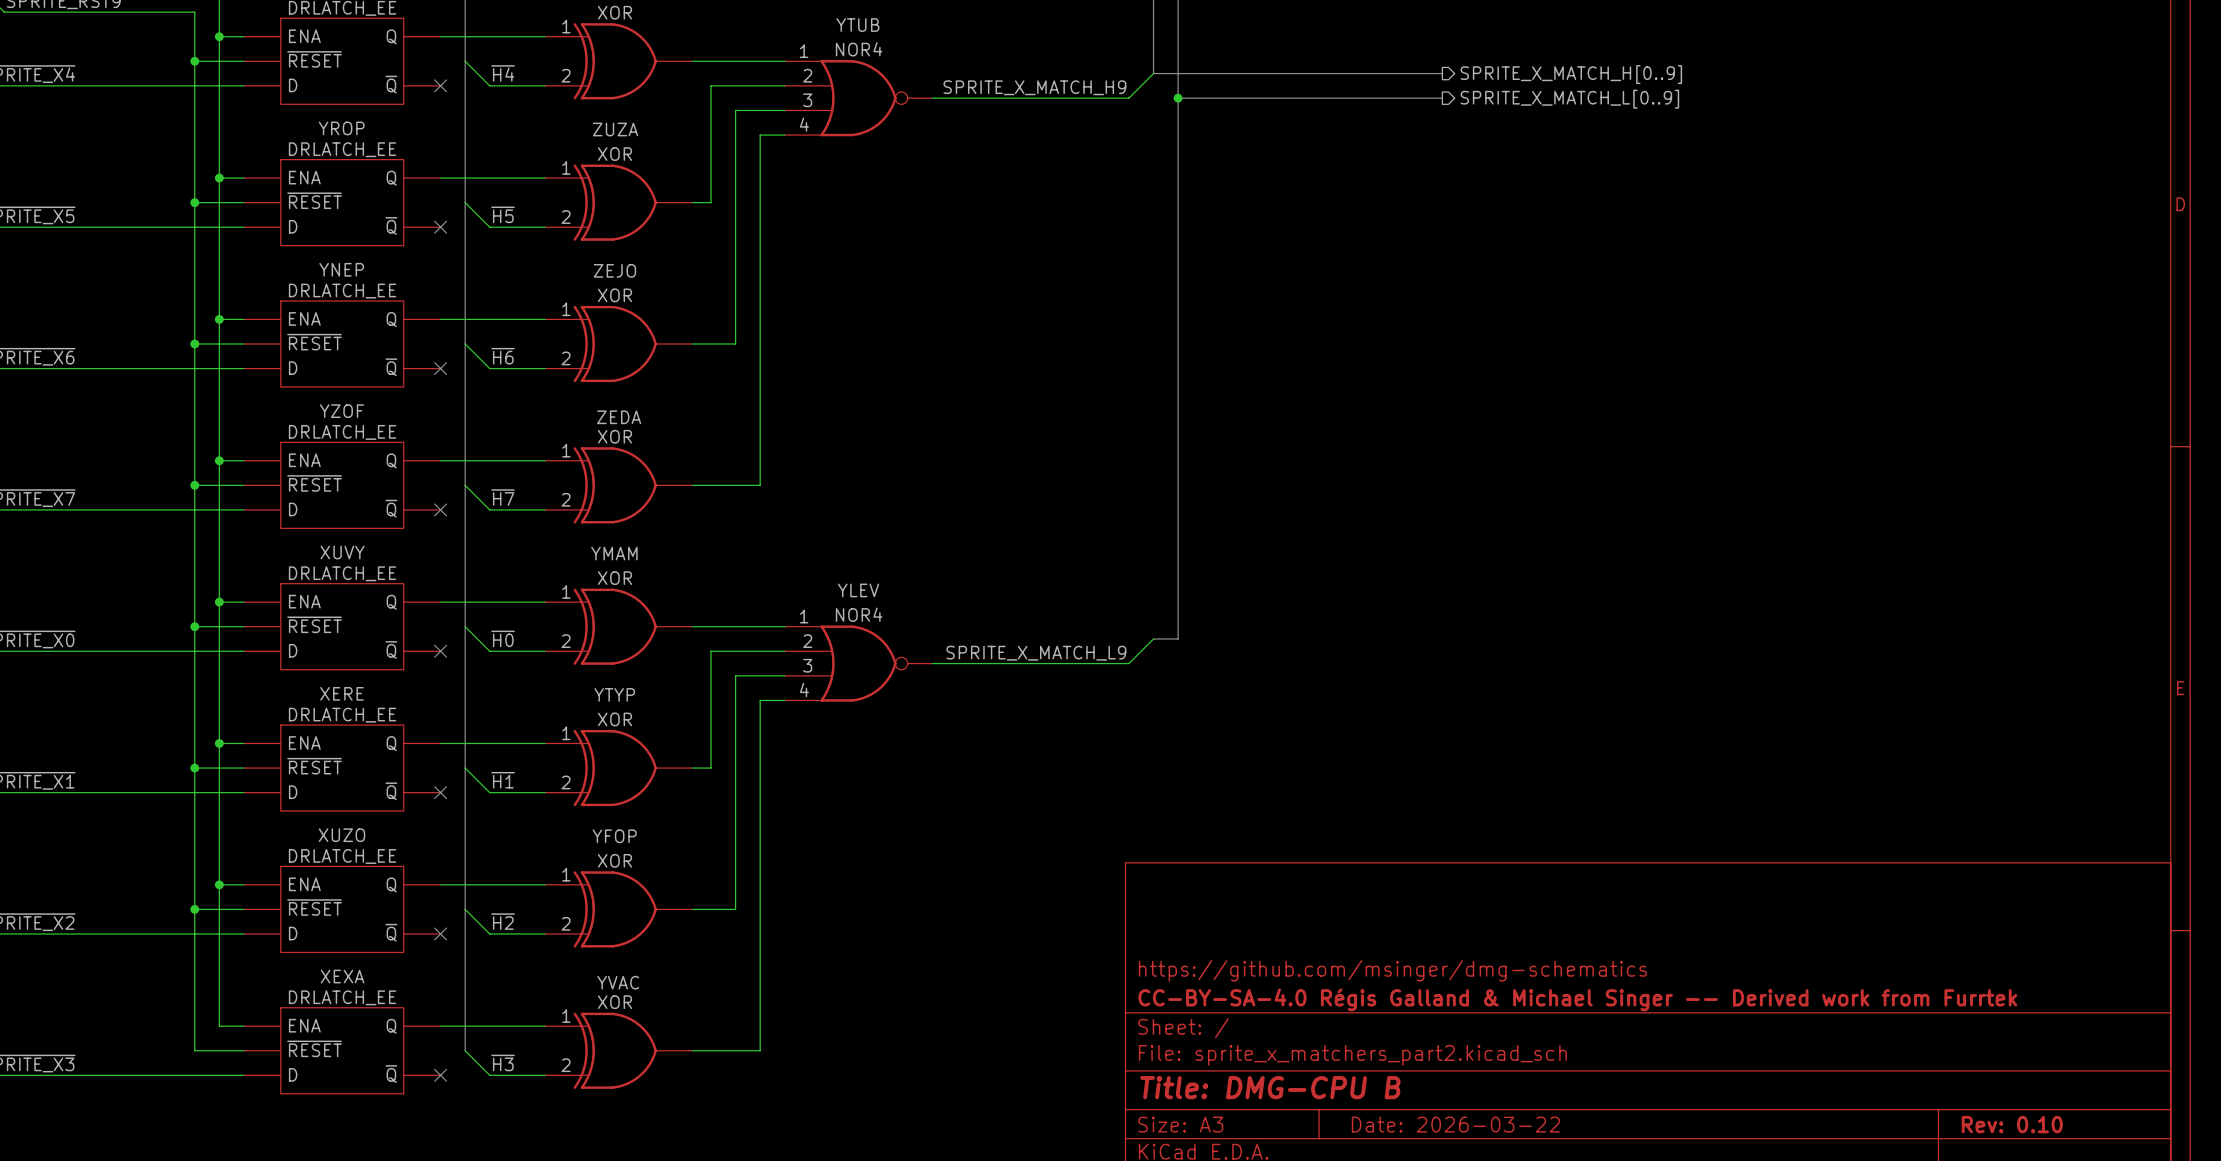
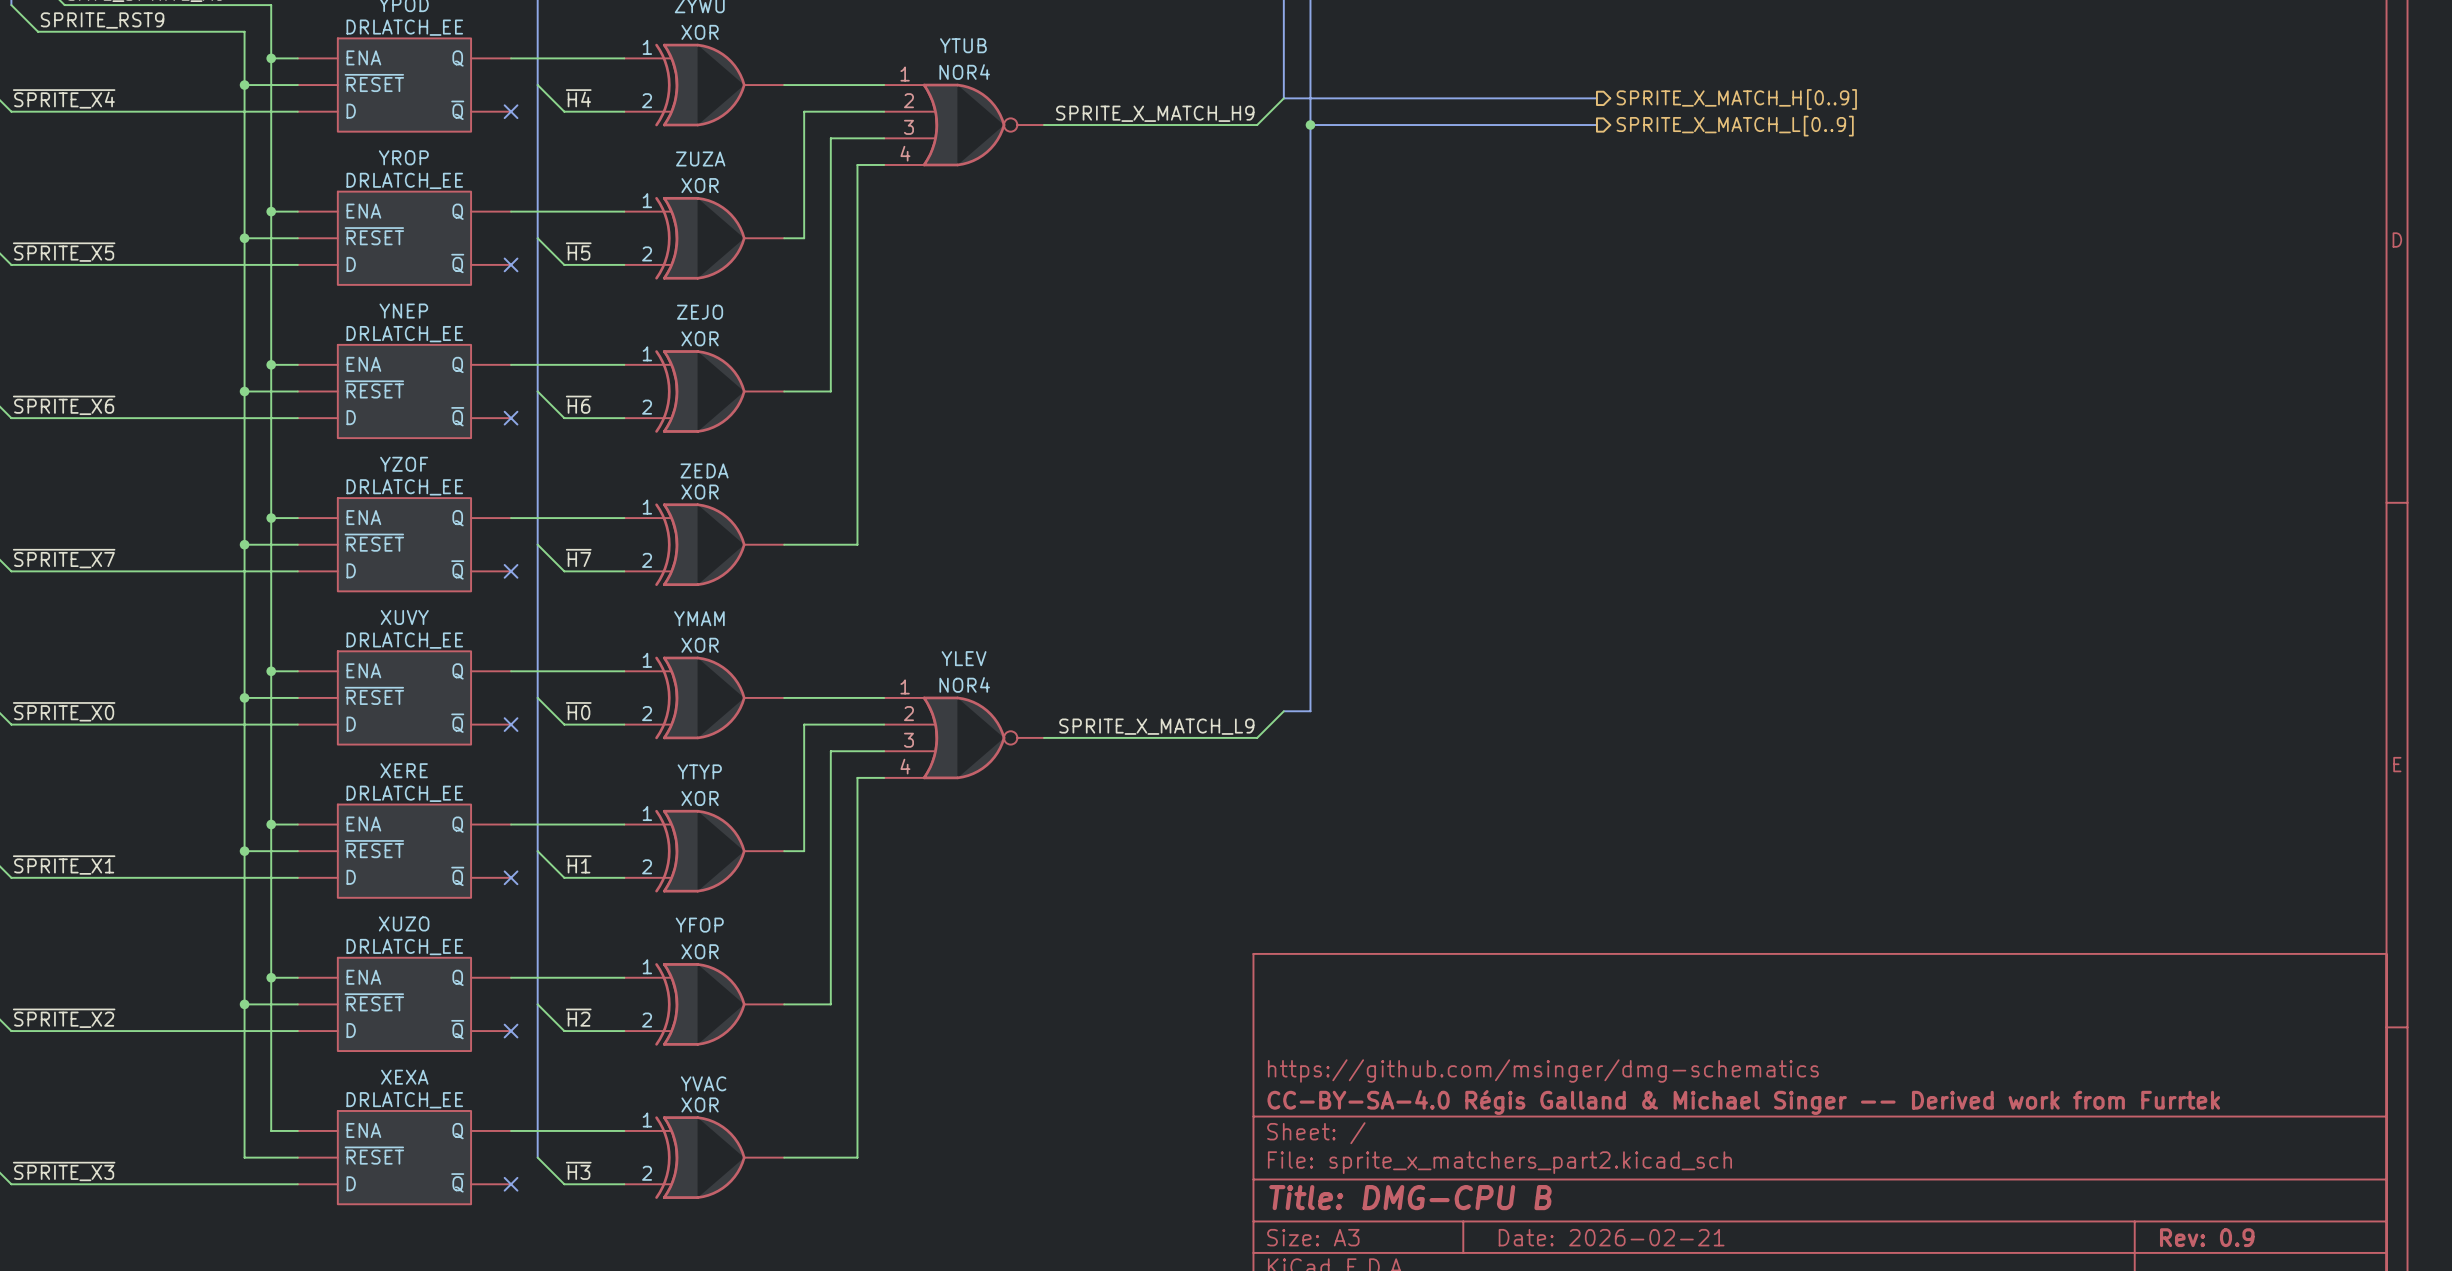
title block: Date: 2026-03-22 (1455, 1124) -> Date: 2026-02-21 (1611, 1237)
title block: Rev: 0.10 (2012, 1124) -> Rev: 0.9 (2207, 1237)

